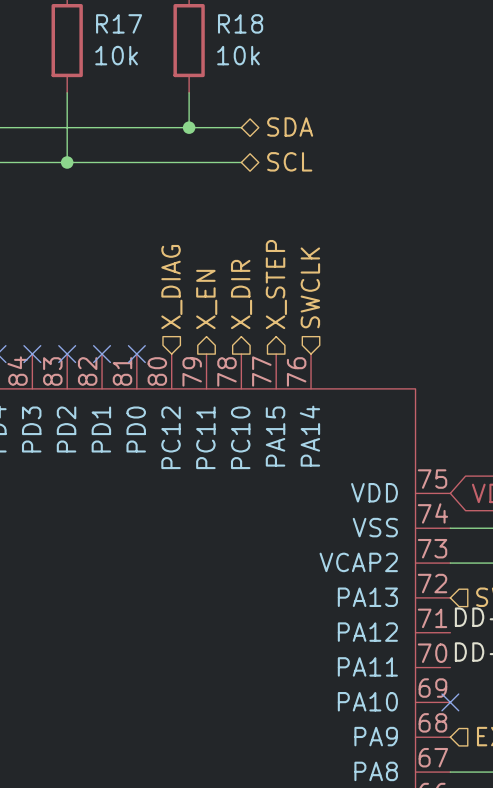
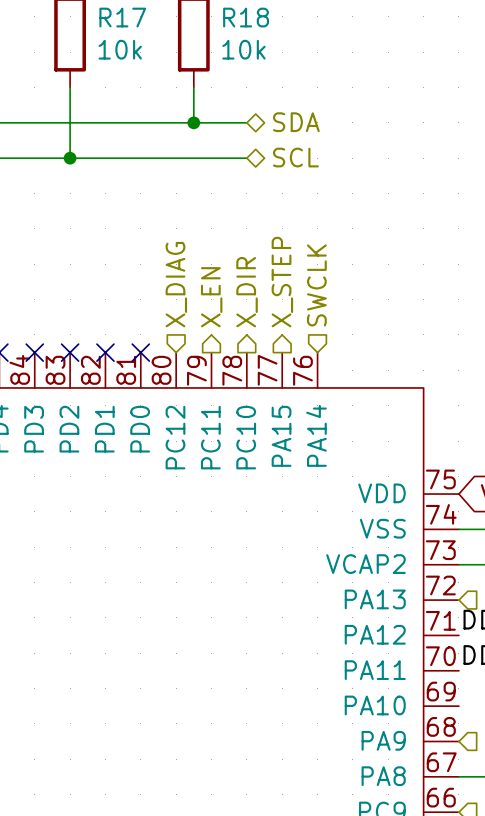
no-connect mark: (450, 702) -> none

